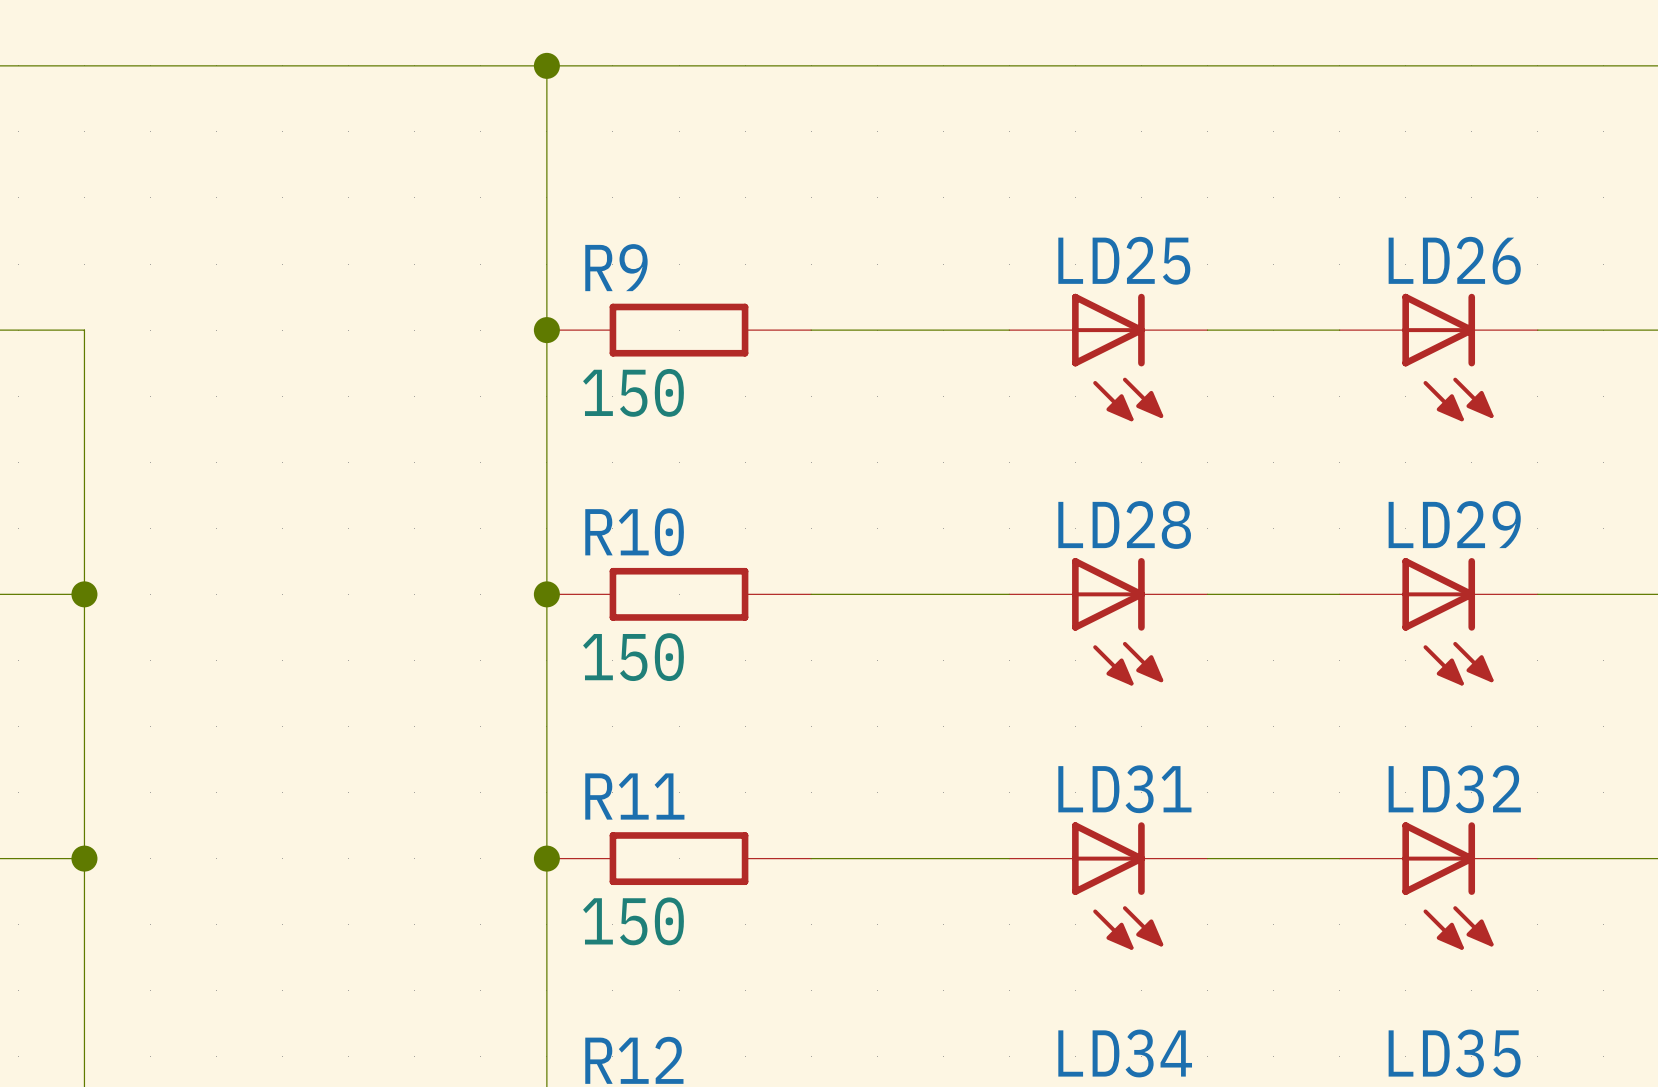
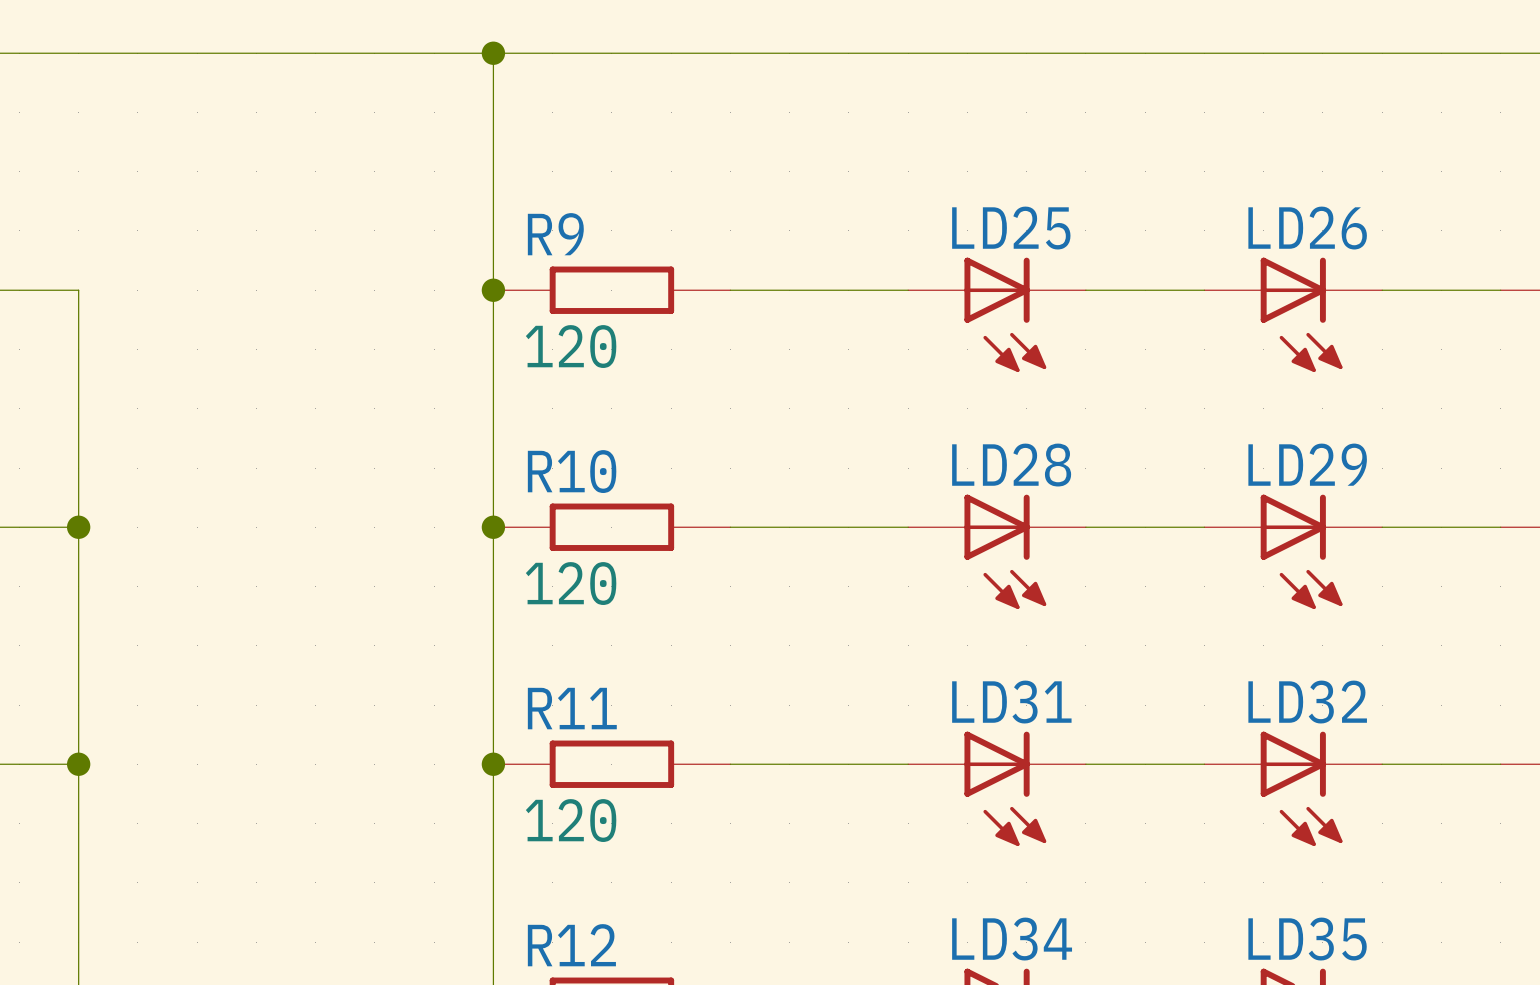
R9 value: 150 (633, 392) -> 120 (571, 346)
R10 value: 150 (633, 657) -> 120 (571, 583)
R11 value: 150 (633, 921) -> 120 (571, 820)

